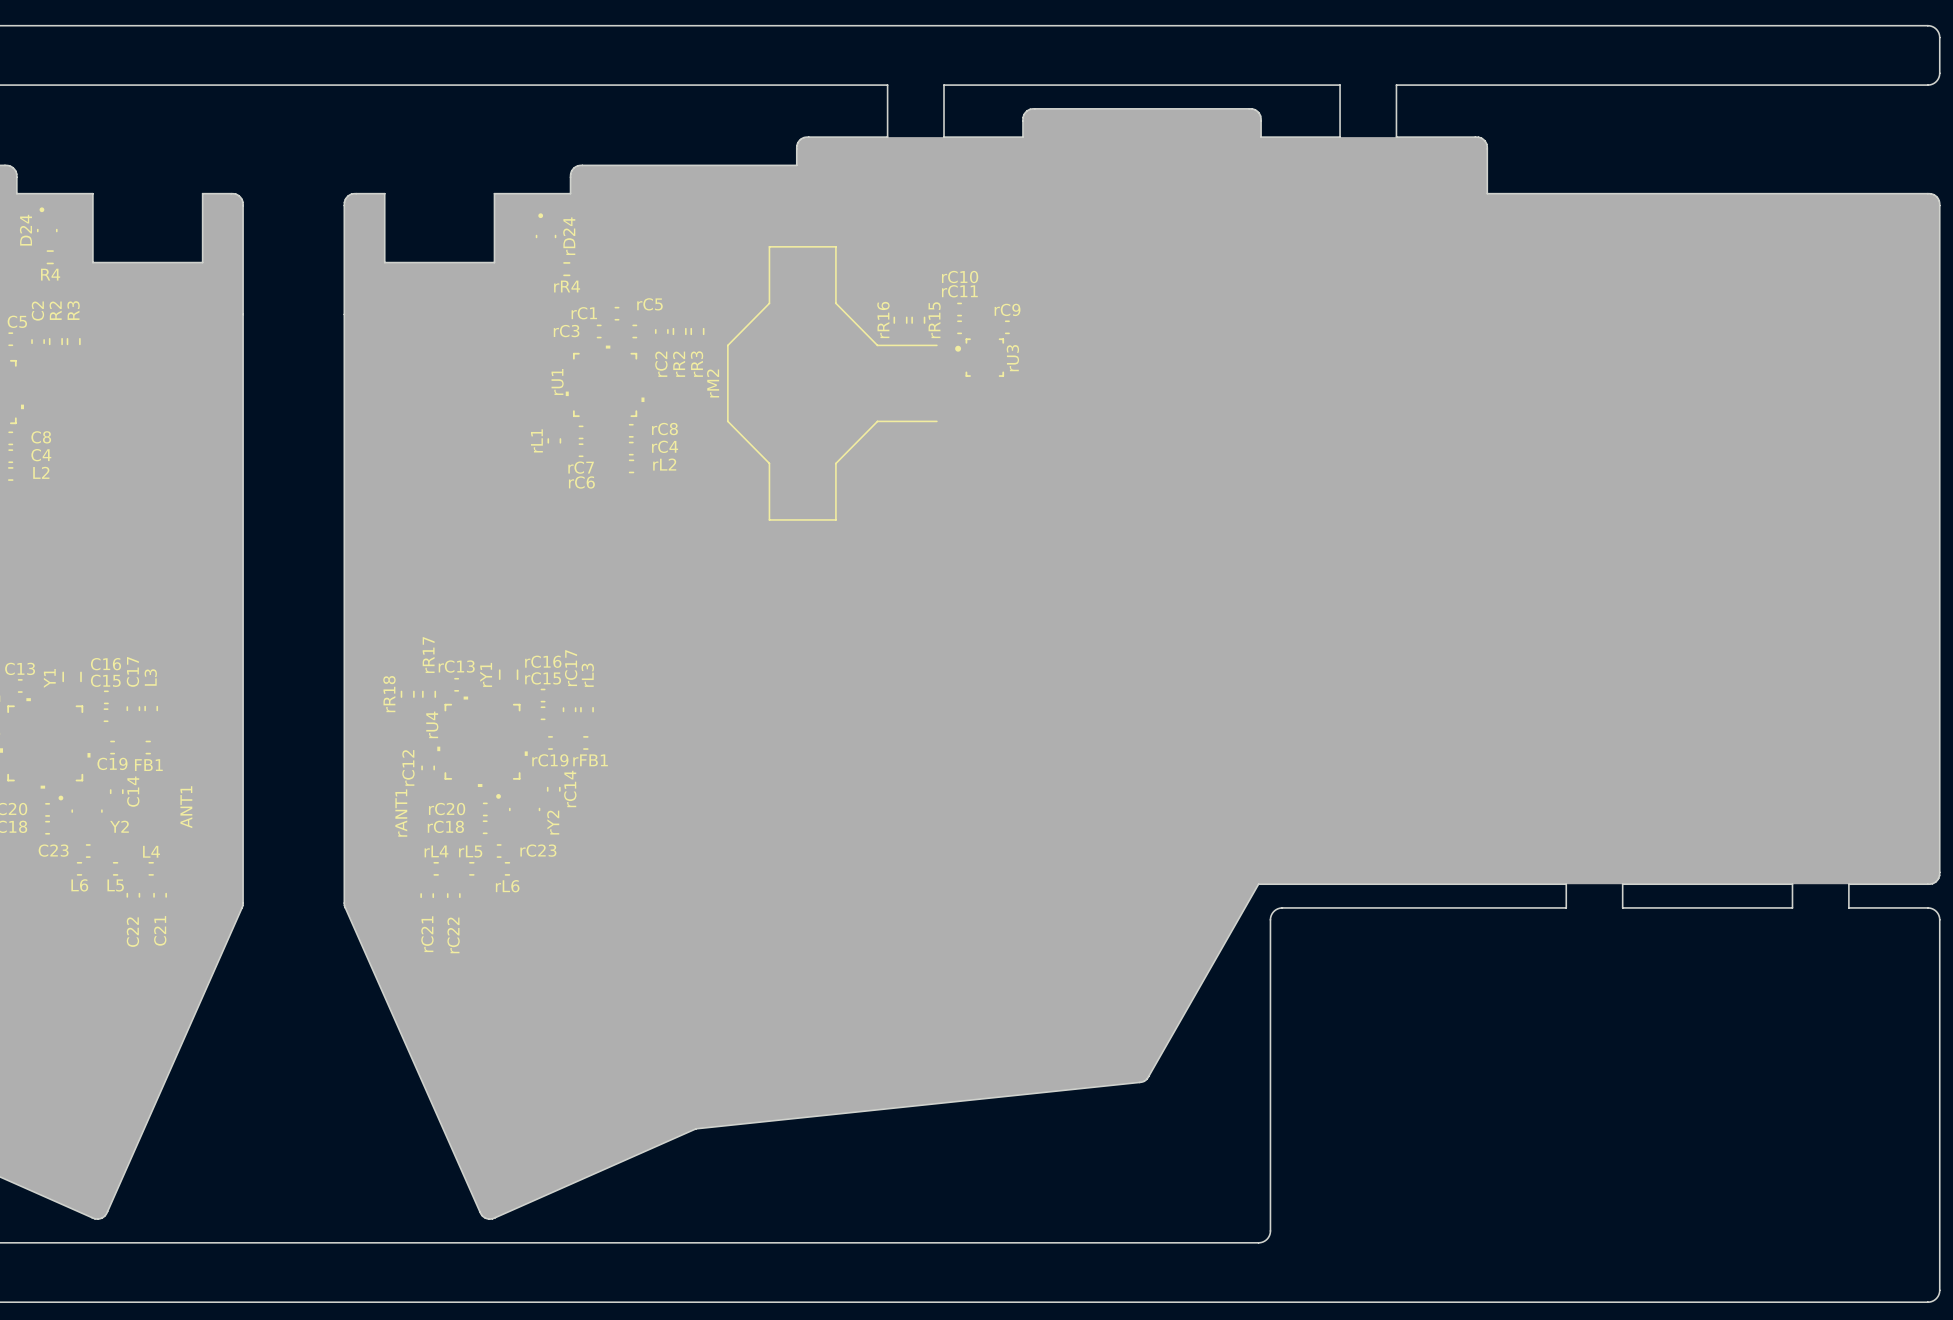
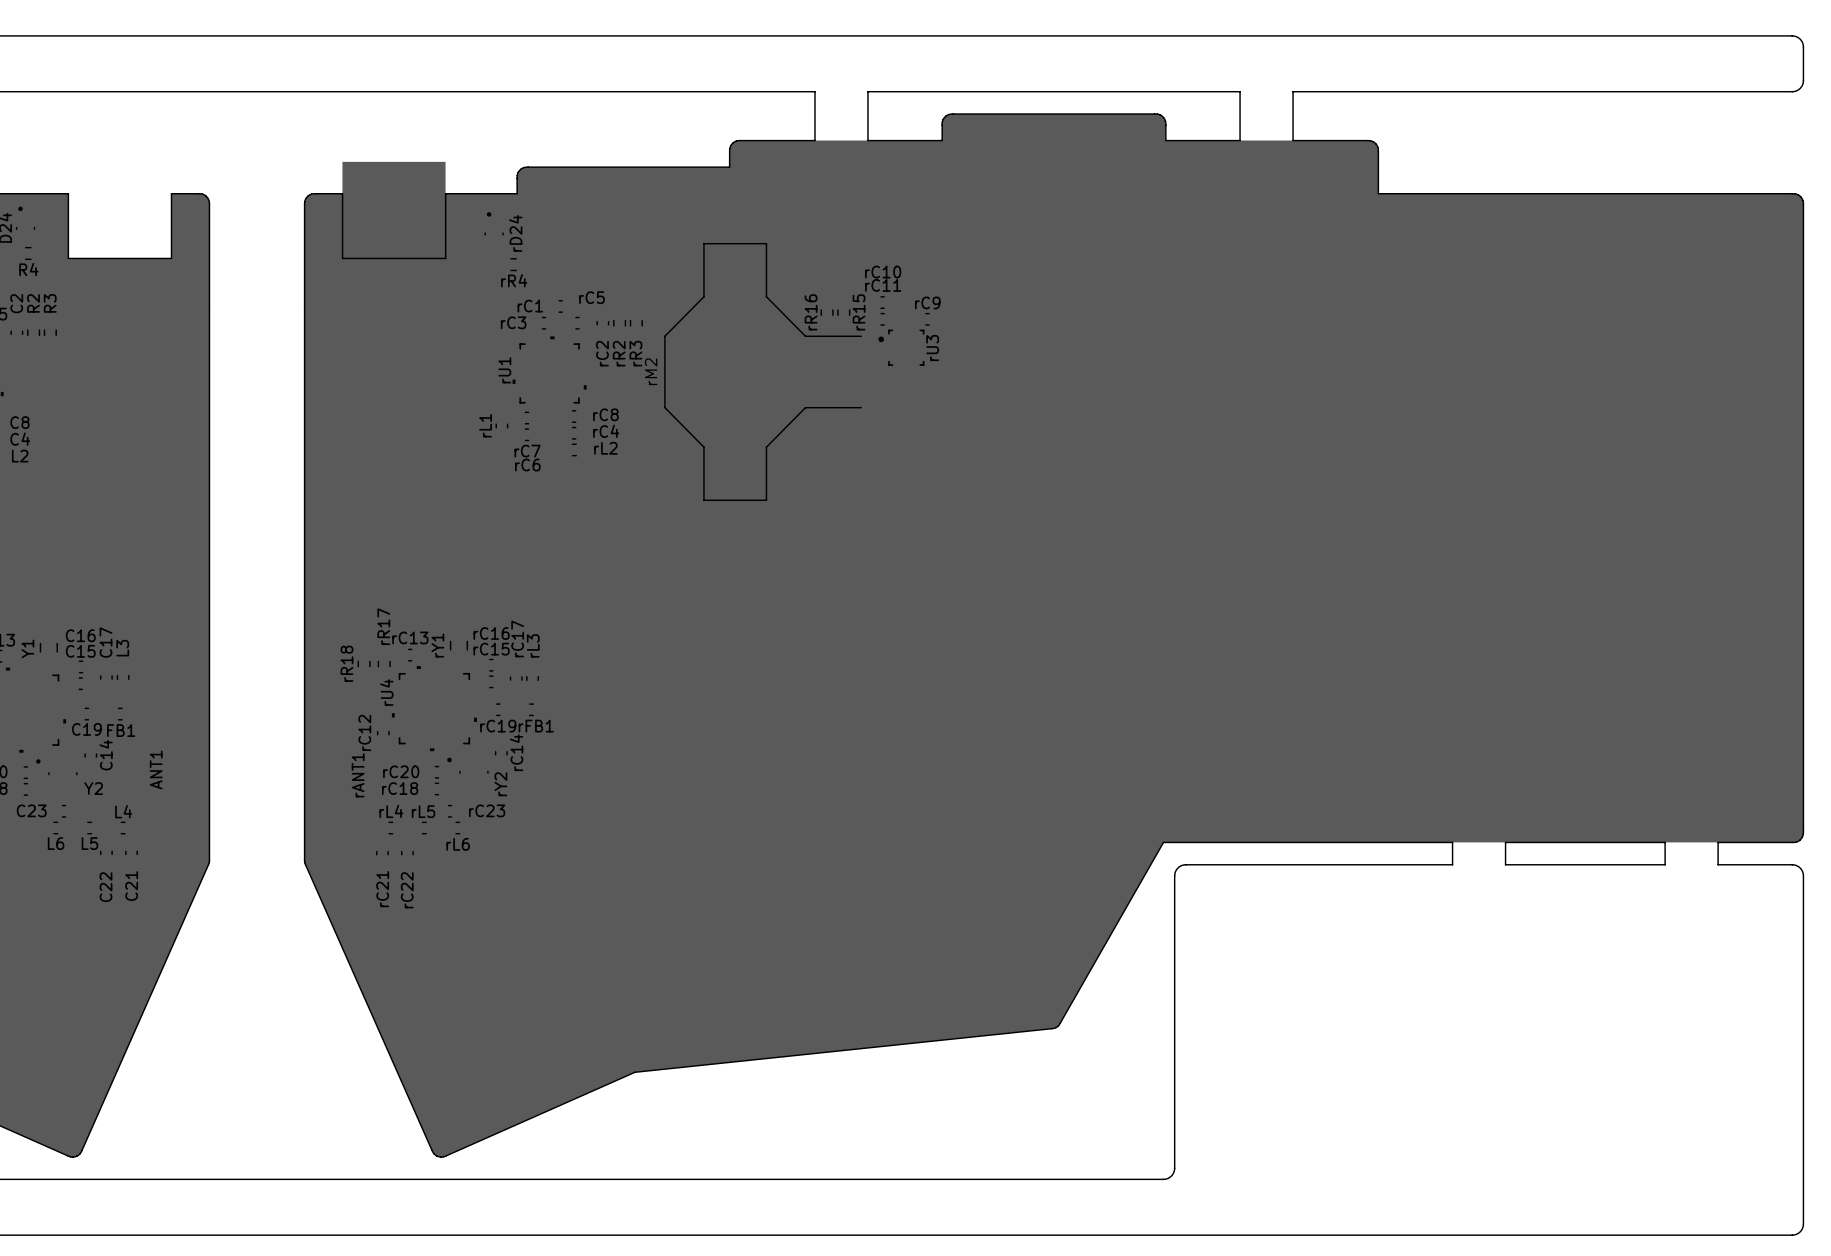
drawing shape: [344, 108, 1940, 1220] -> [304, 113, 1804, 1157]

